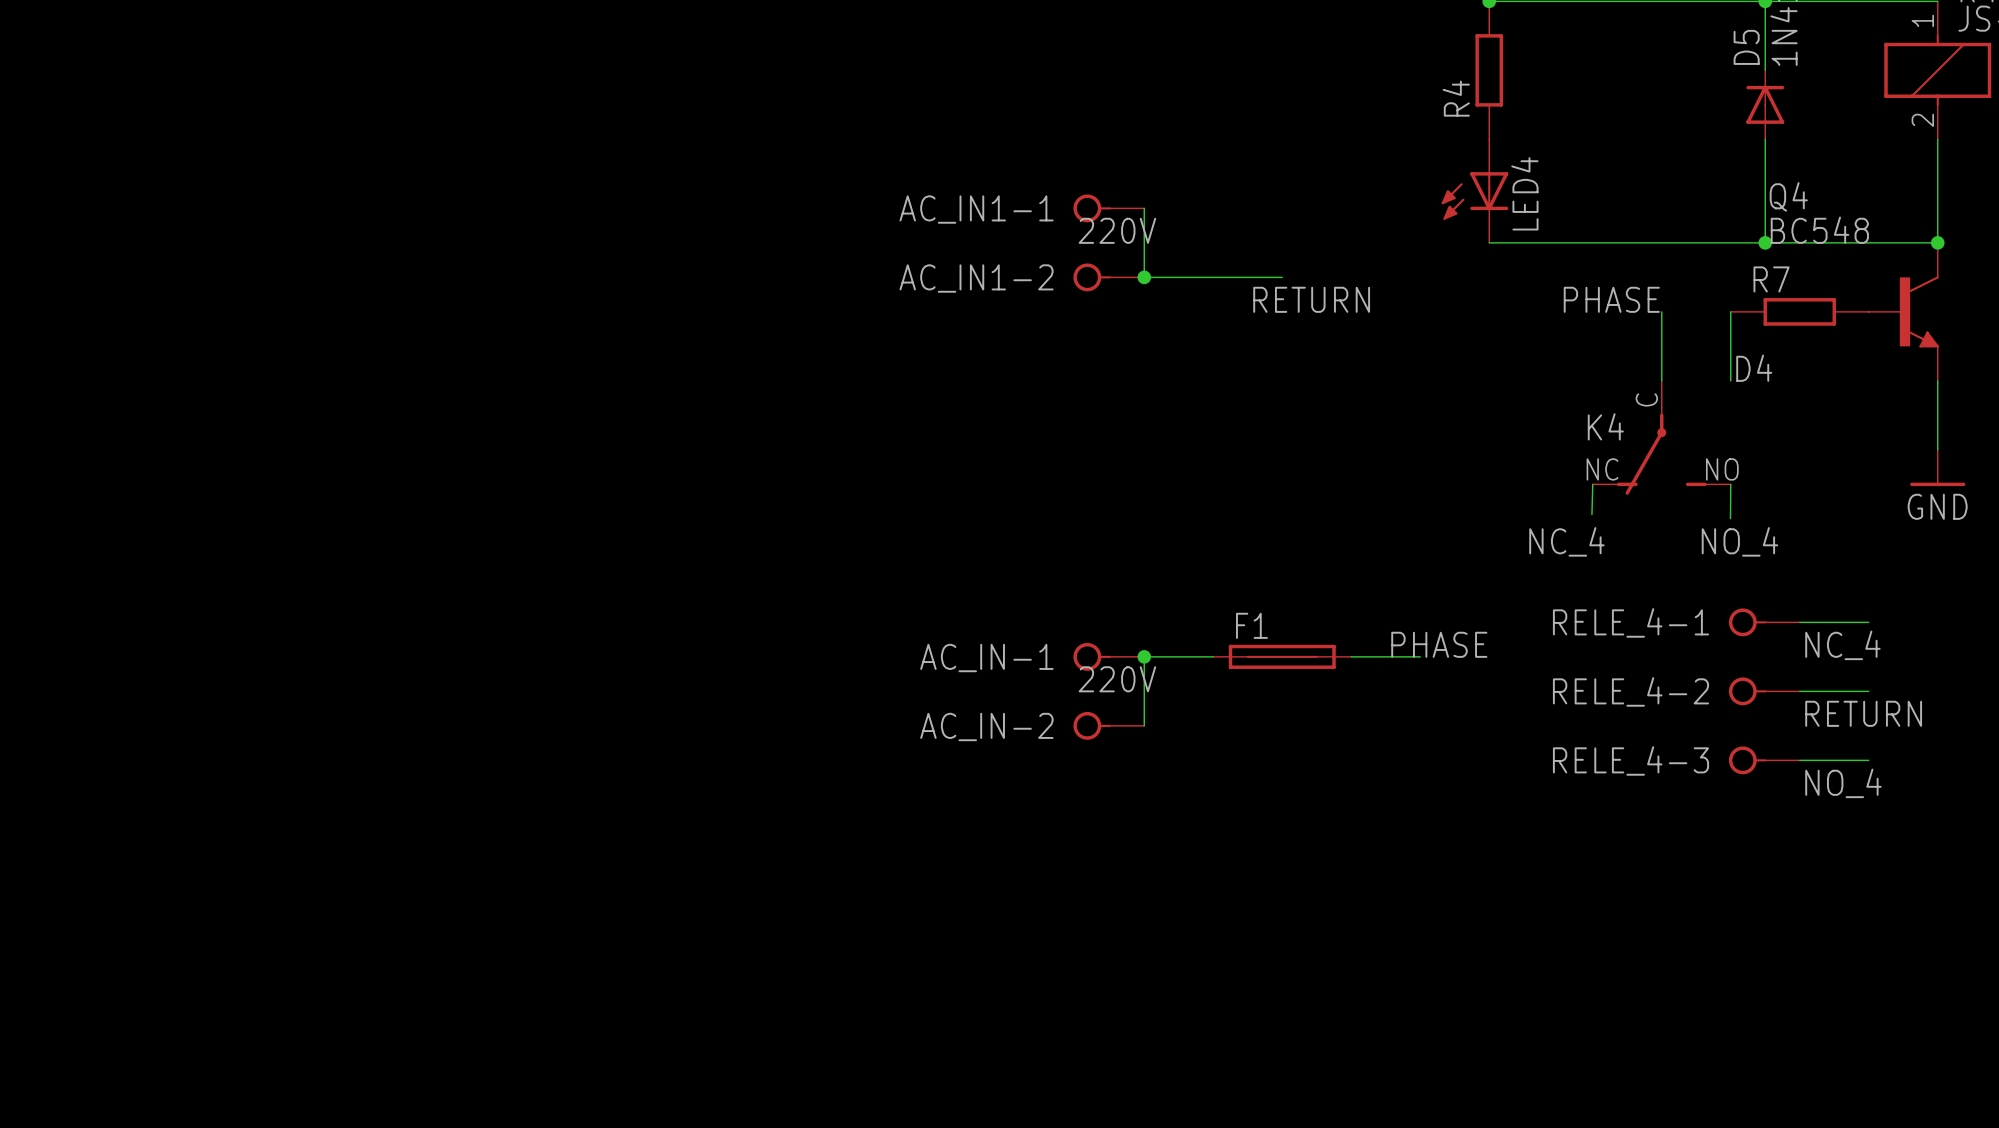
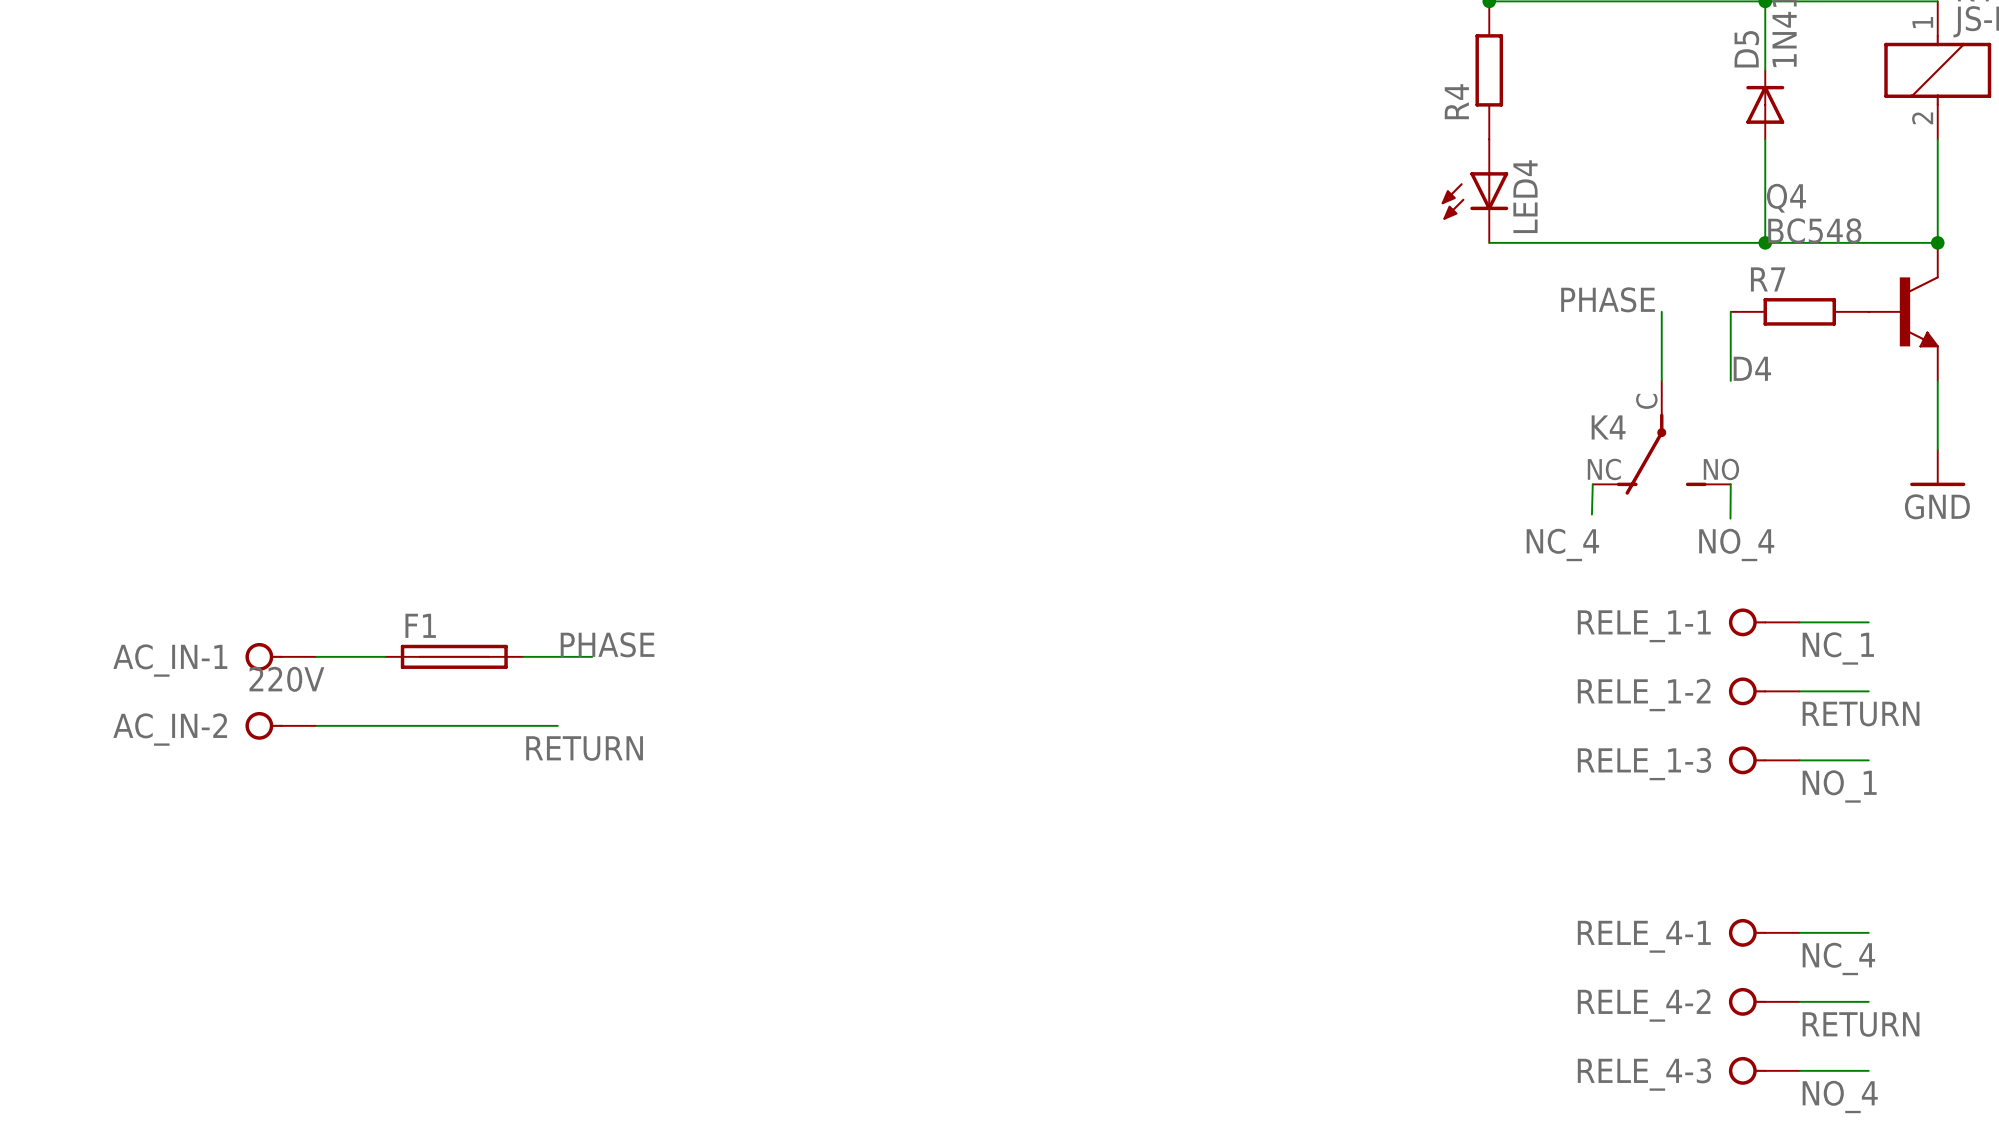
AC_IN1-1: (1108, 208) -> none
wire: (1144, 208) (1144, 277) (1282, 277) -> none
AC_IN1-2: 220V (1108, 277) -> none
junction: (1144, 277) -> none
label: RETURN (1311, 299) -> none
RELE_4-1 name: RELE_4-1 (1630, 622) -> RELE_1-1 (1644, 626)
label: none -> PHASE (607, 644)
label: PHASE (1439, 644) -> none
label: NC_4 (1842, 645) -> NC_1 (1838, 648)
wire: none -> (316, 656) (385, 656)
wire: none -> (523, 656) (592, 656)
AC_IN-1 position: (1108, 656) -> (280, 656)
junction: (1144, 656) -> none
wire: (1213, 656) (1144, 656) (1144, 725) -> none
F1 position: (1282, 656) -> (454, 656)
wire: (1351, 656) (1420, 656) -> none
RELE_4-2 name: RELE_4-2 (1630, 691) -> RELE_1-2 (1644, 695)
wire: none -> (316, 725) (557, 725)
AC_IN-2 position: (1108, 725) -> (280, 725)
label: none -> RETURN (584, 748)
RELE_4-3 name: RELE_4-3 (1630, 760) -> RELE_1-3 (1644, 764)
label: NO_4 (1843, 783) -> NO_1 (1839, 786)
RELE_4-1: none -> (1764, 932)
wire: none -> (1799, 932) (1868, 932)
label: none -> NC_4 (1838, 958)
RELE_4-2: none -> (1764, 1001)
wire: none -> (1799, 1001) (1868, 1001)
label: none -> RETURN (1861, 1024)
RELE_4-3: none -> (1764, 1070)
wire: none -> (1799, 1070) (1868, 1070)
label: none -> NO_4 (1840, 1096)

